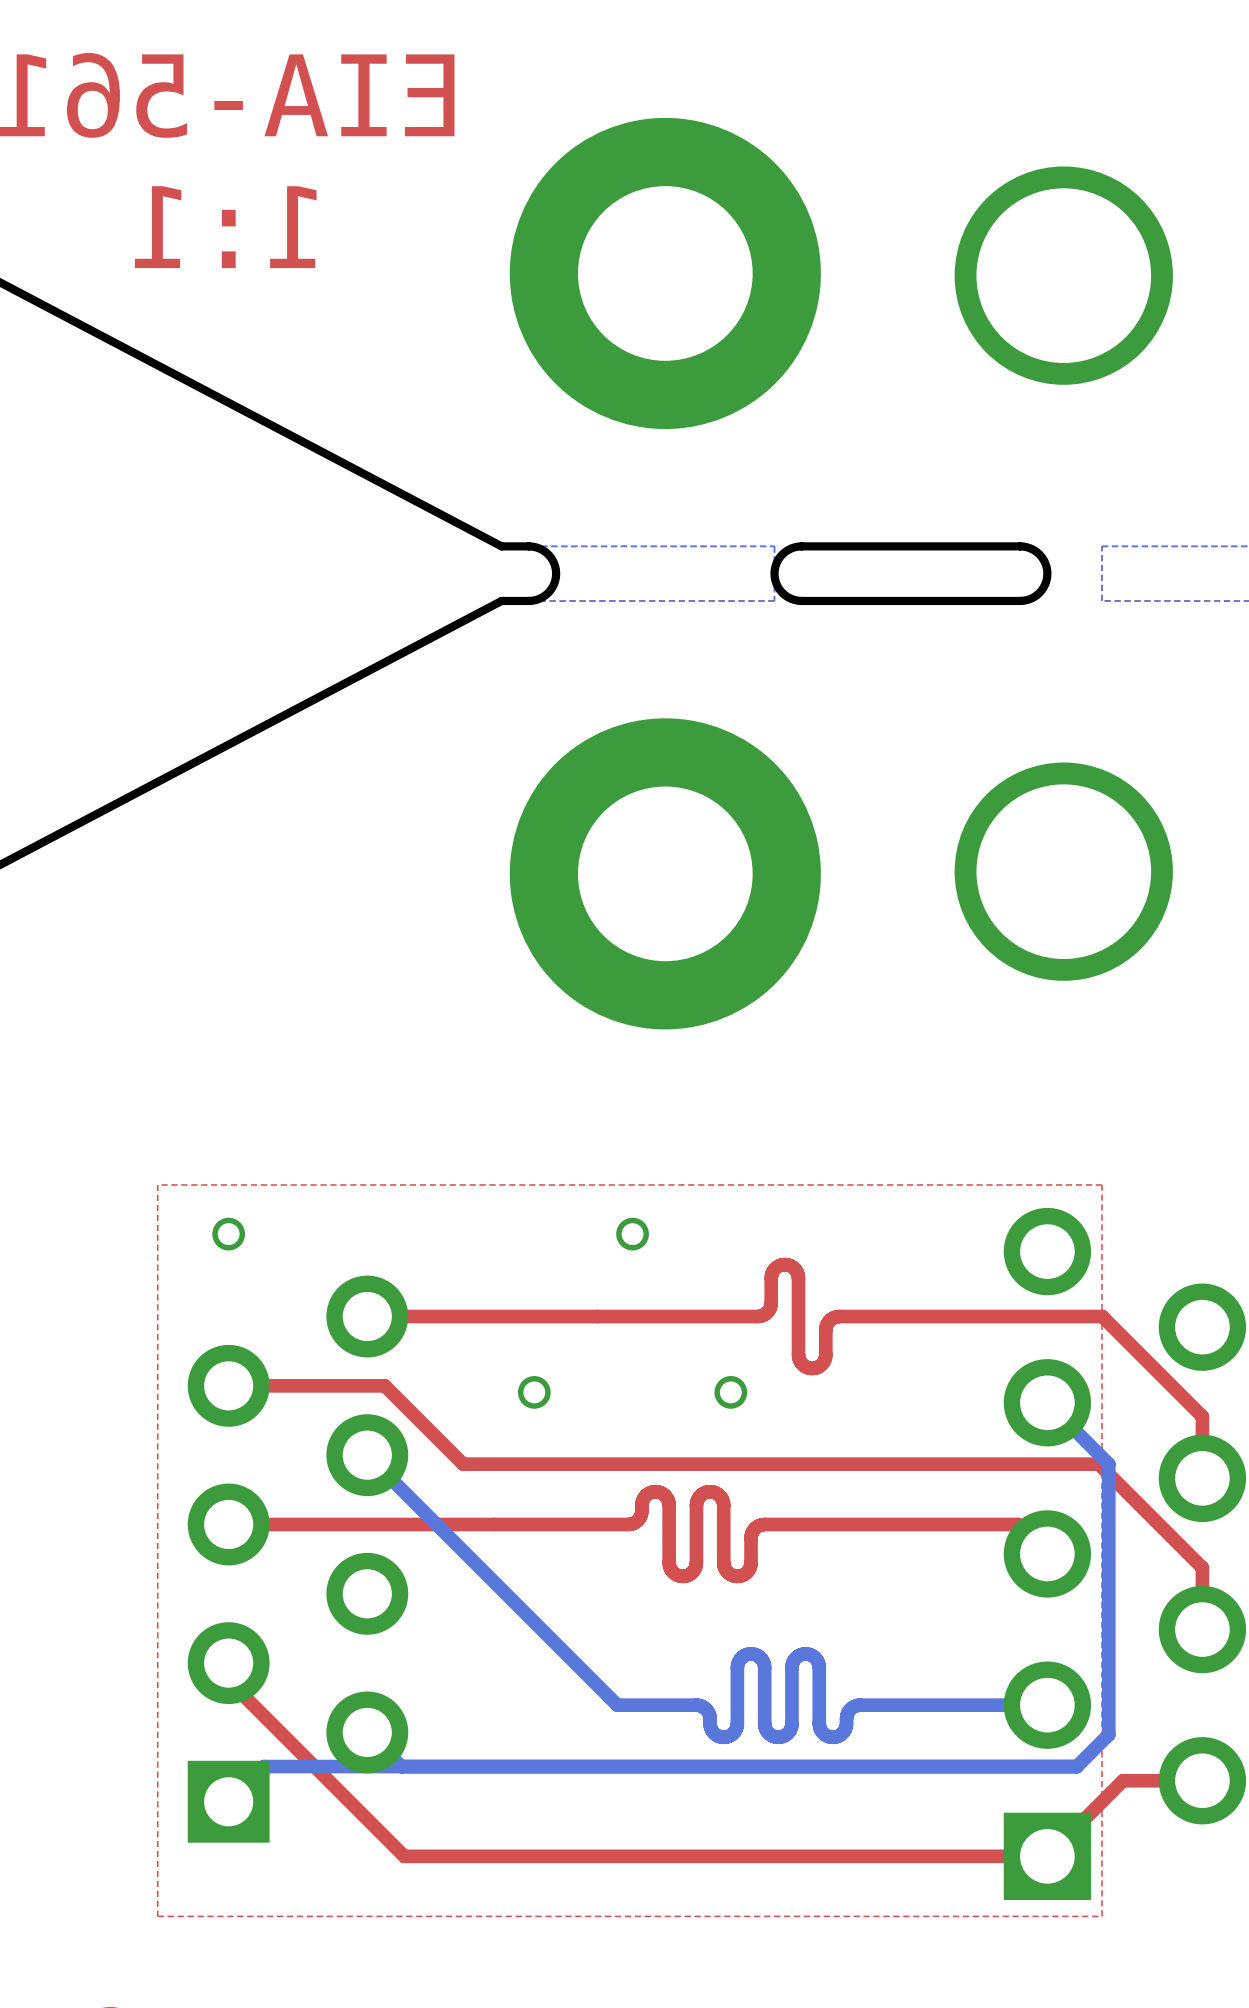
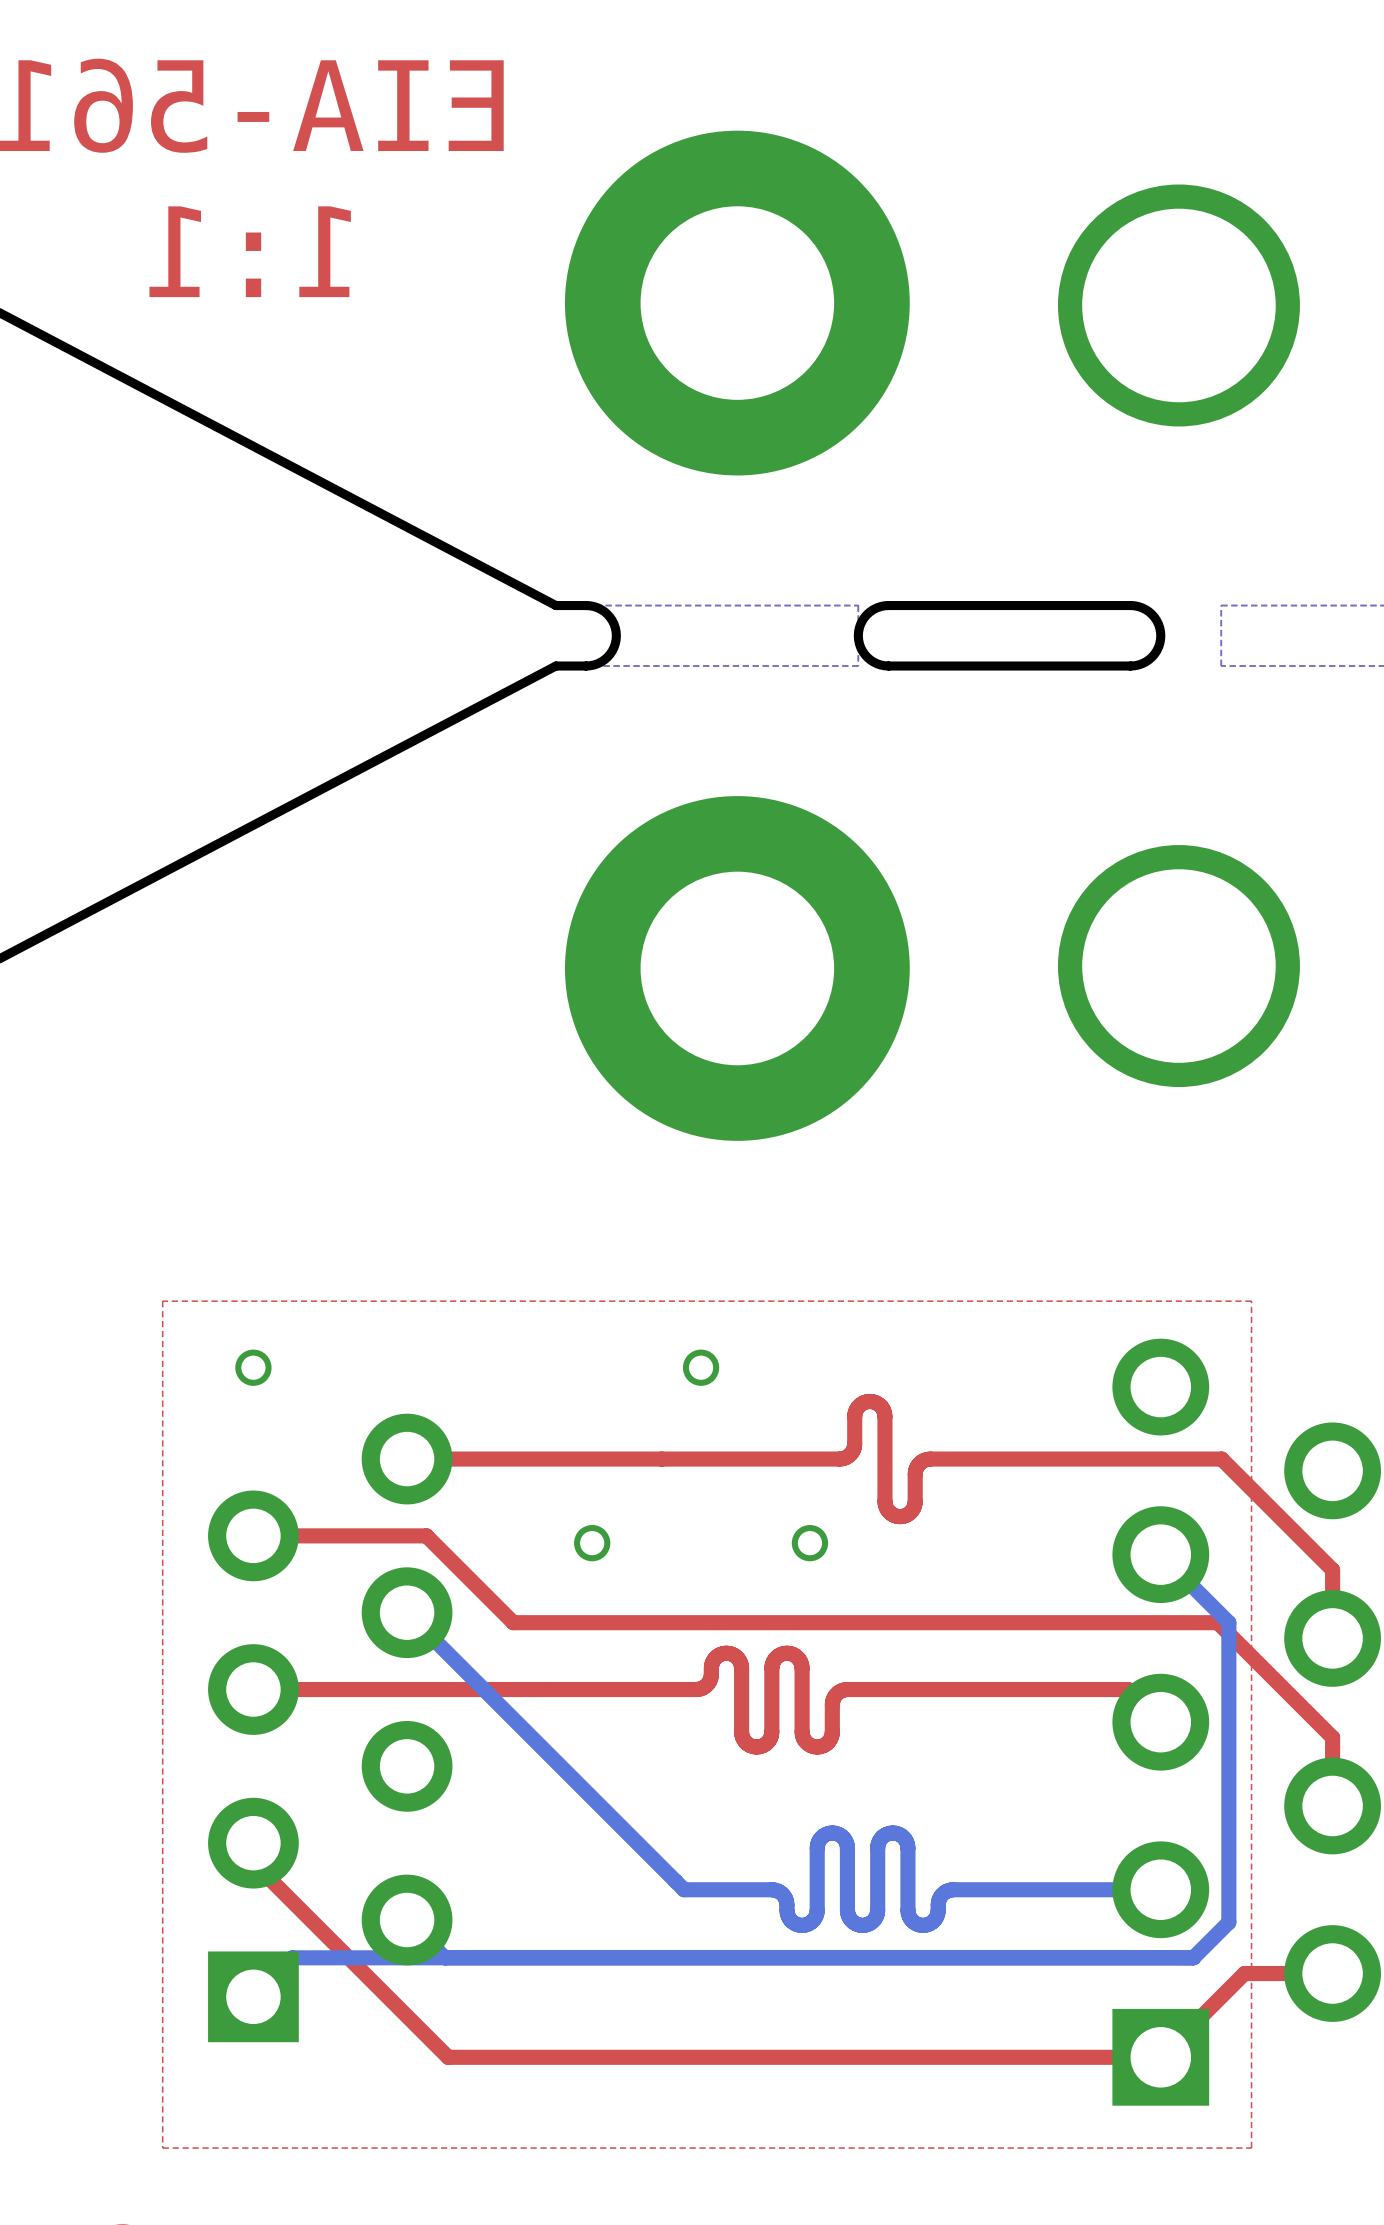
top zone outline: (1101, 1184) (1101, 1916) (157, 1916) (157, 1184) (1101, 1184) -> (1251, 1301) (1251, 2148) (162, 2148) (162, 1301) (1251, 1301)

